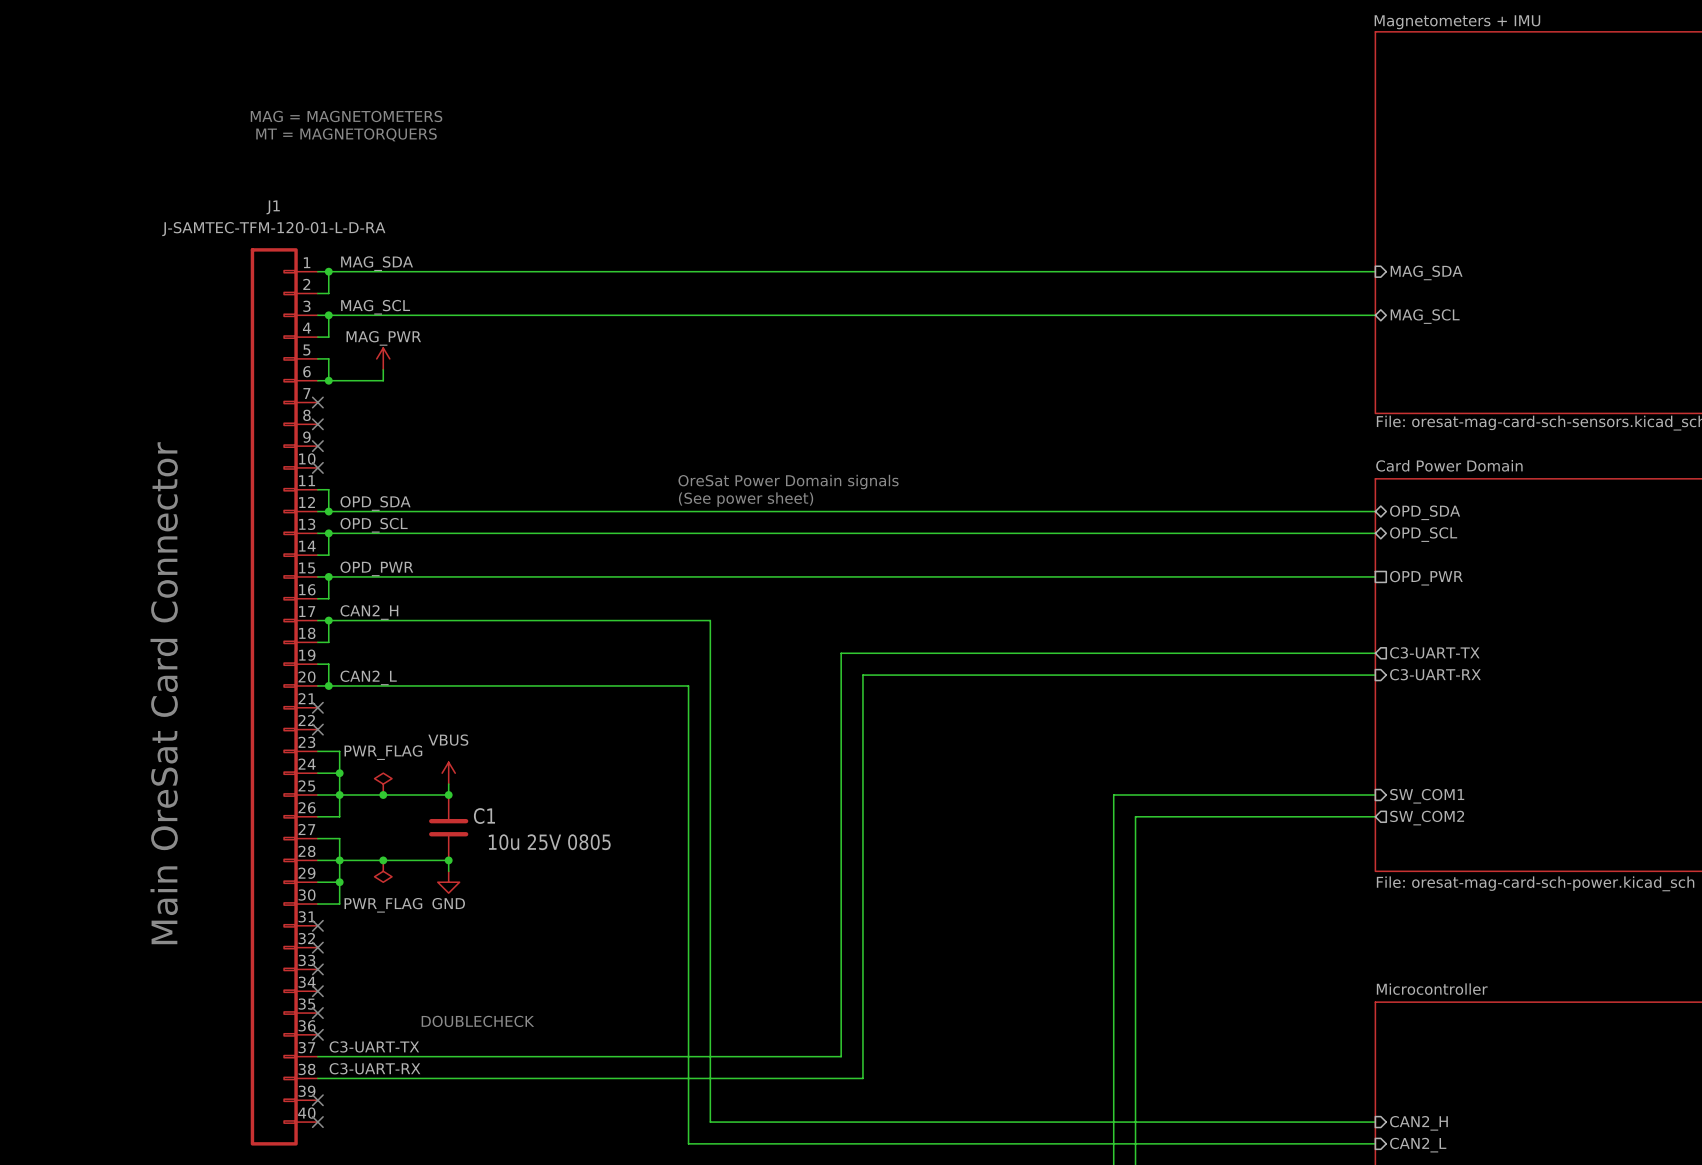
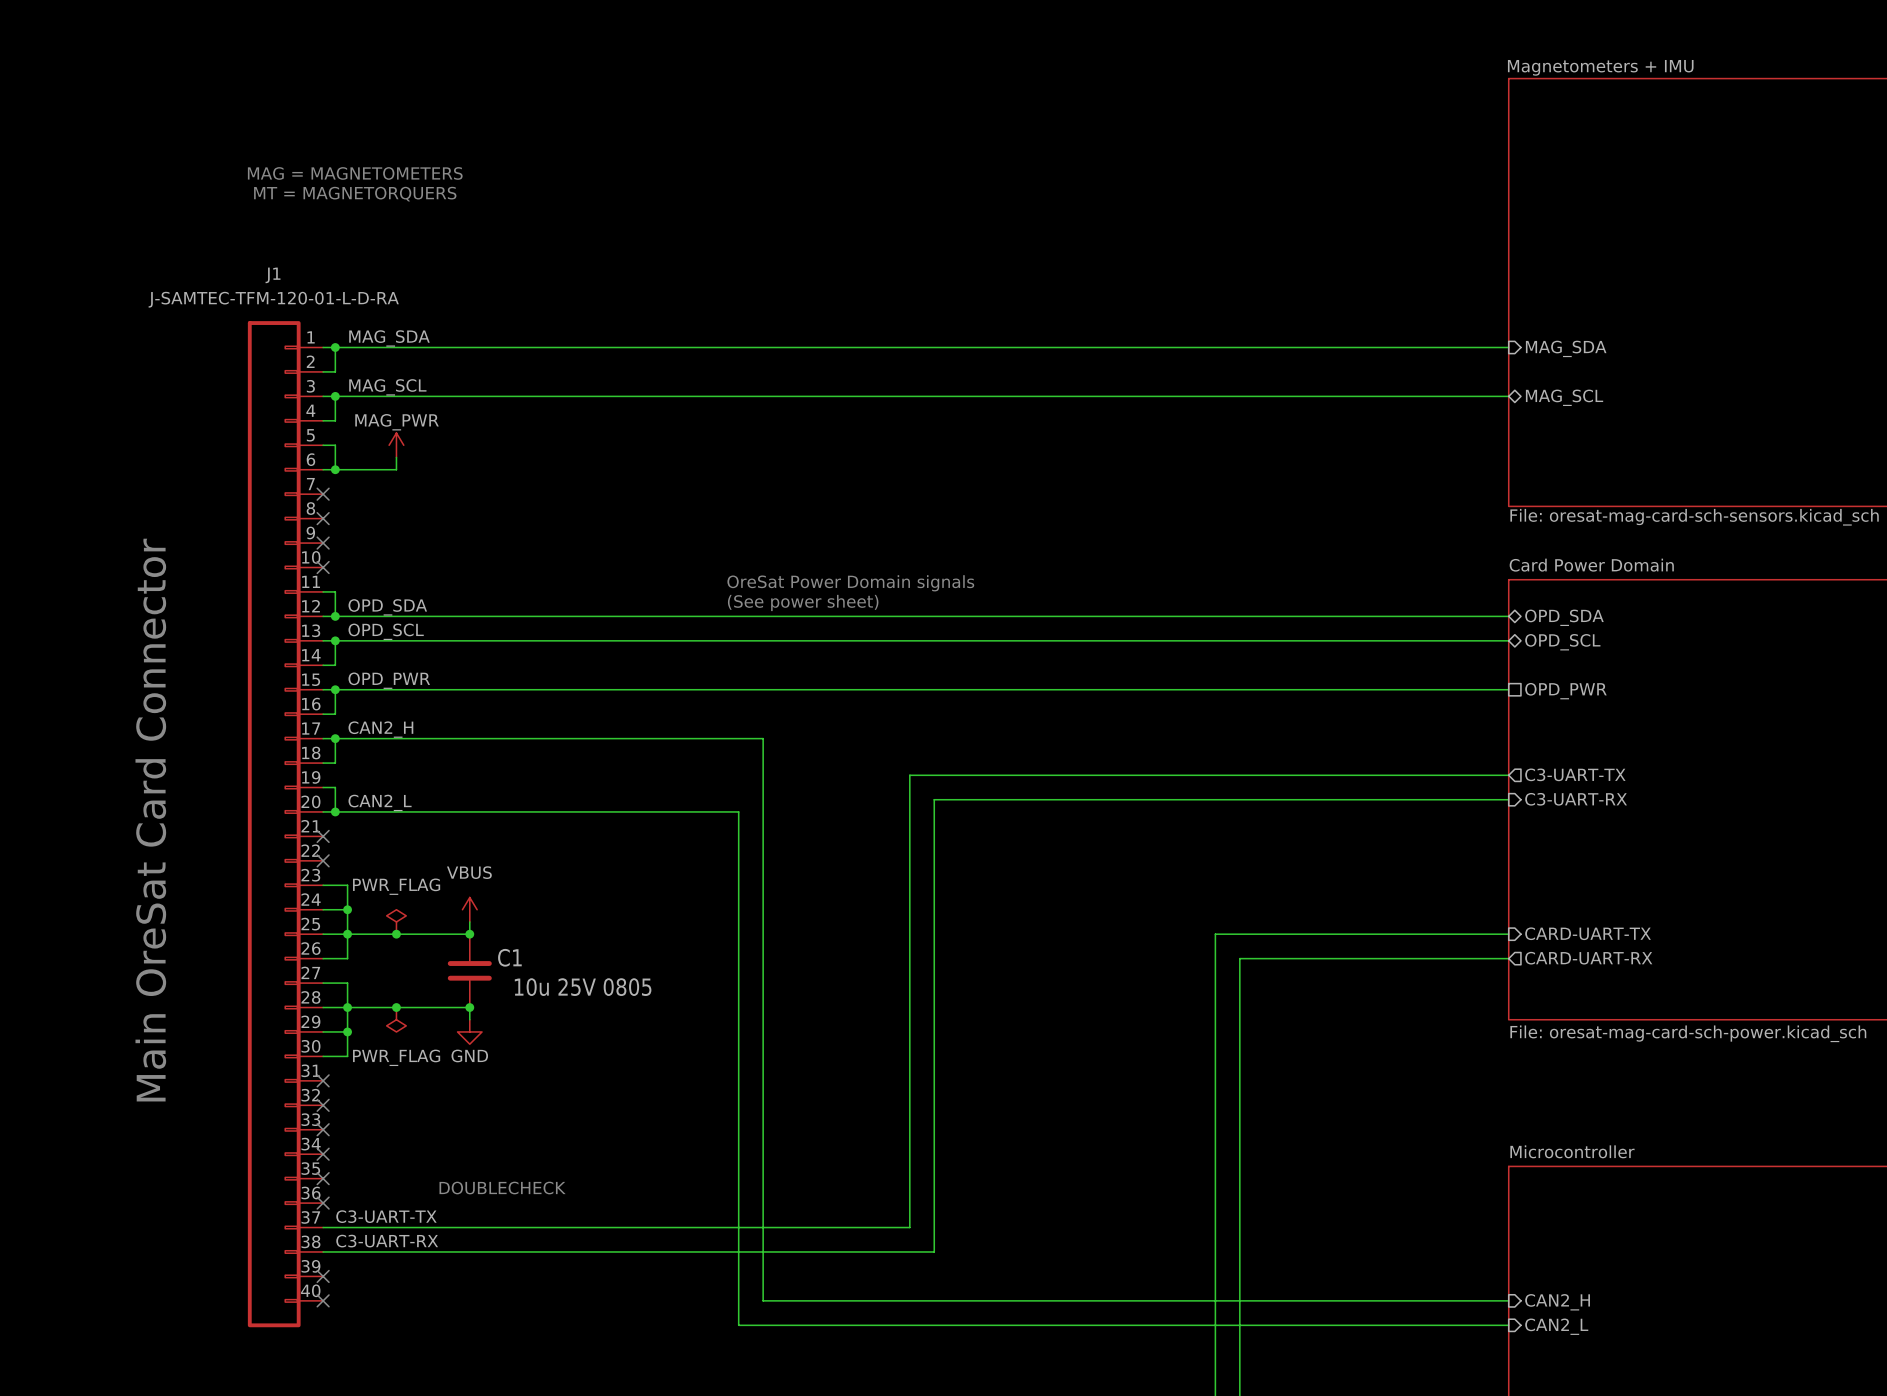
sheet pin: SW_COM1 (1427, 796) -> CARD-UART-TX (1588, 933)
sheet pin: SW_COM2 (1427, 818) -> CARD-UART-RX (1588, 958)

